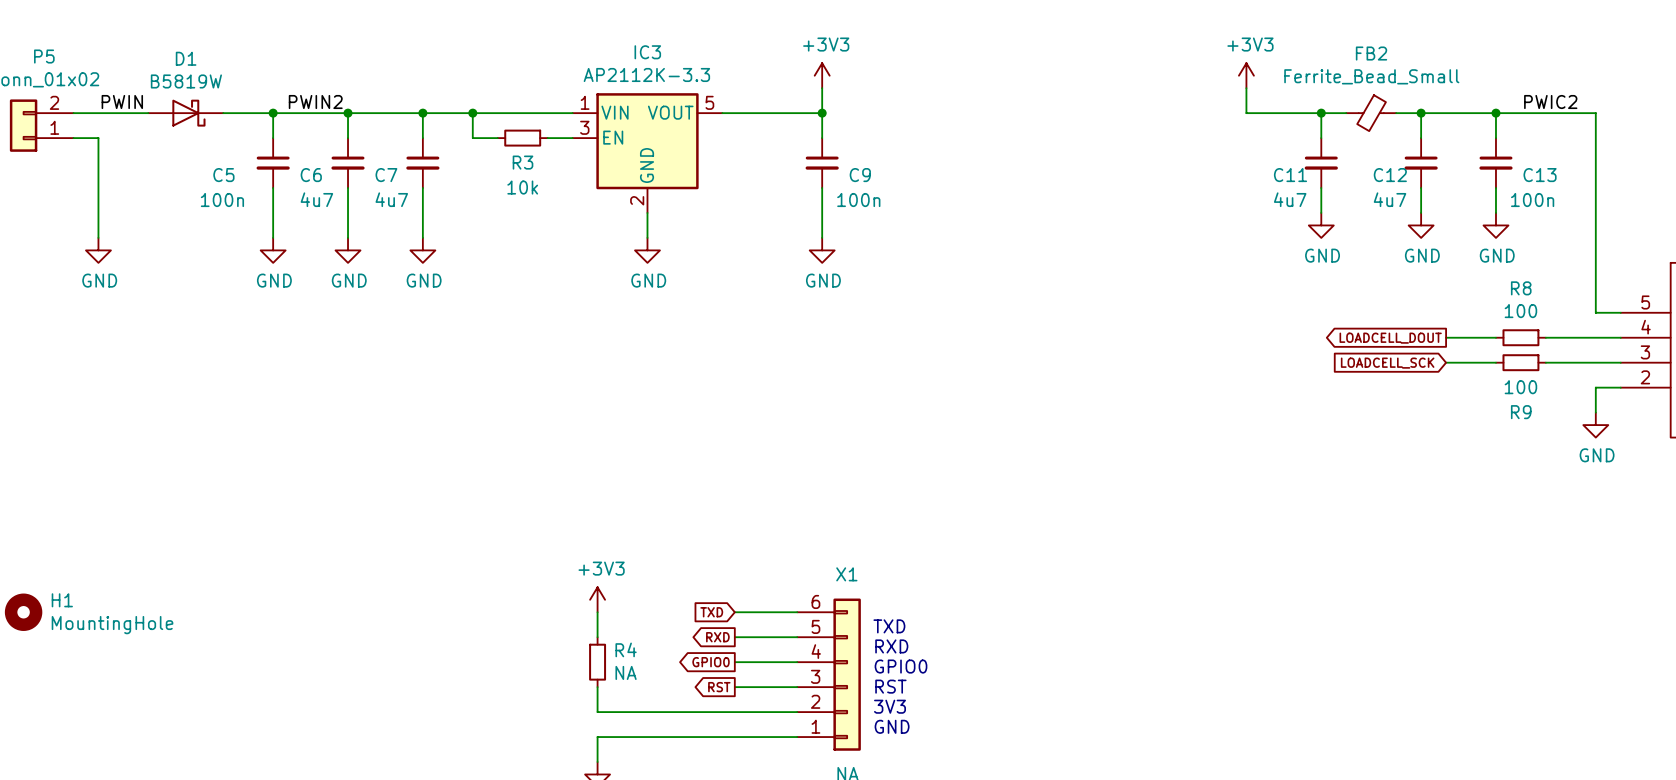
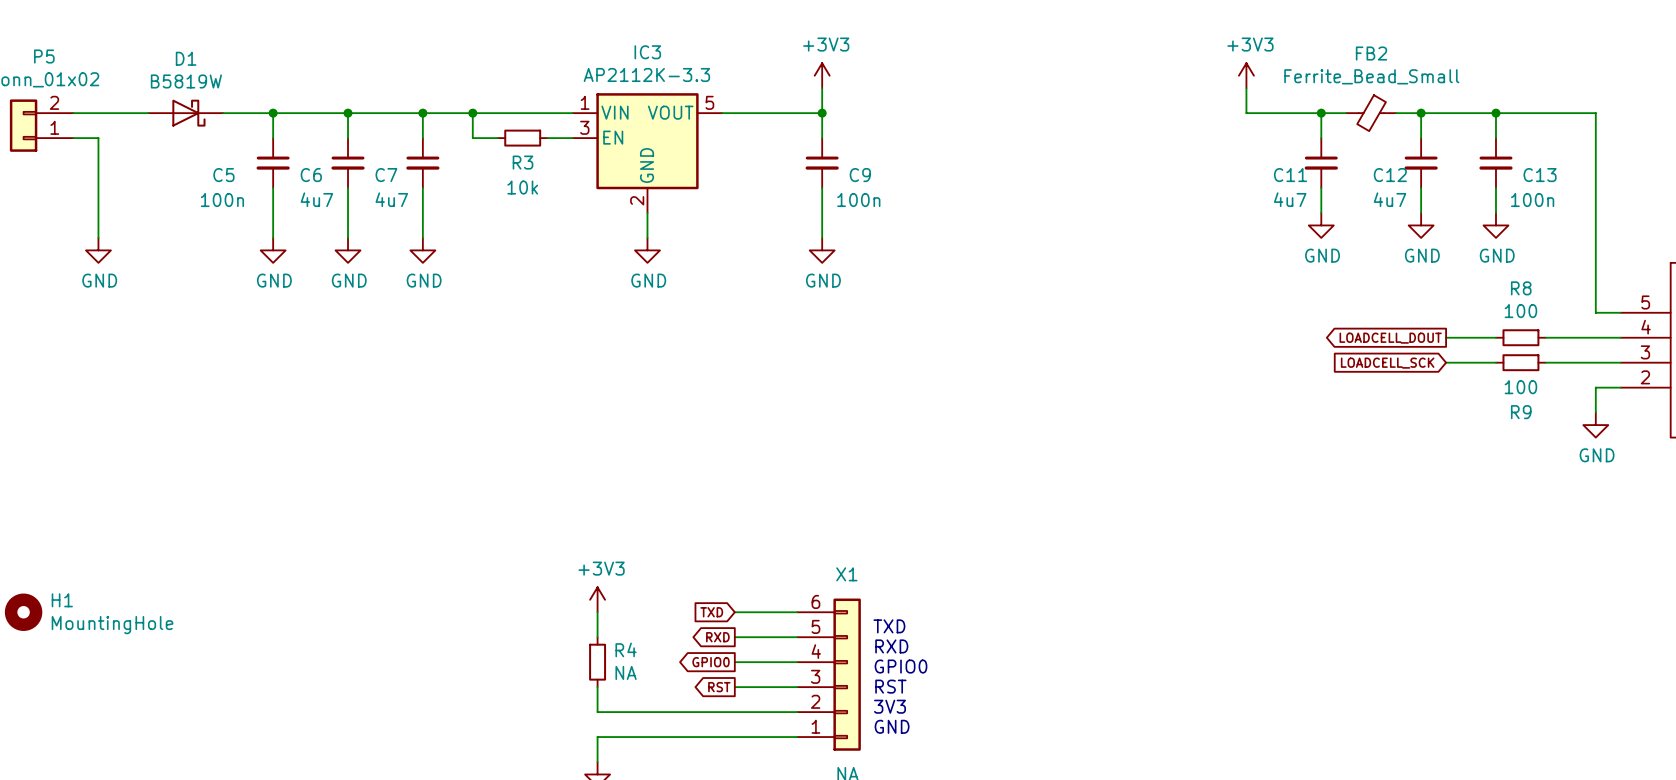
label: PWIN (122, 102) -> none
label: PWIN2 (315, 102) -> none
label: PWIC2 (1550, 102) -> none

